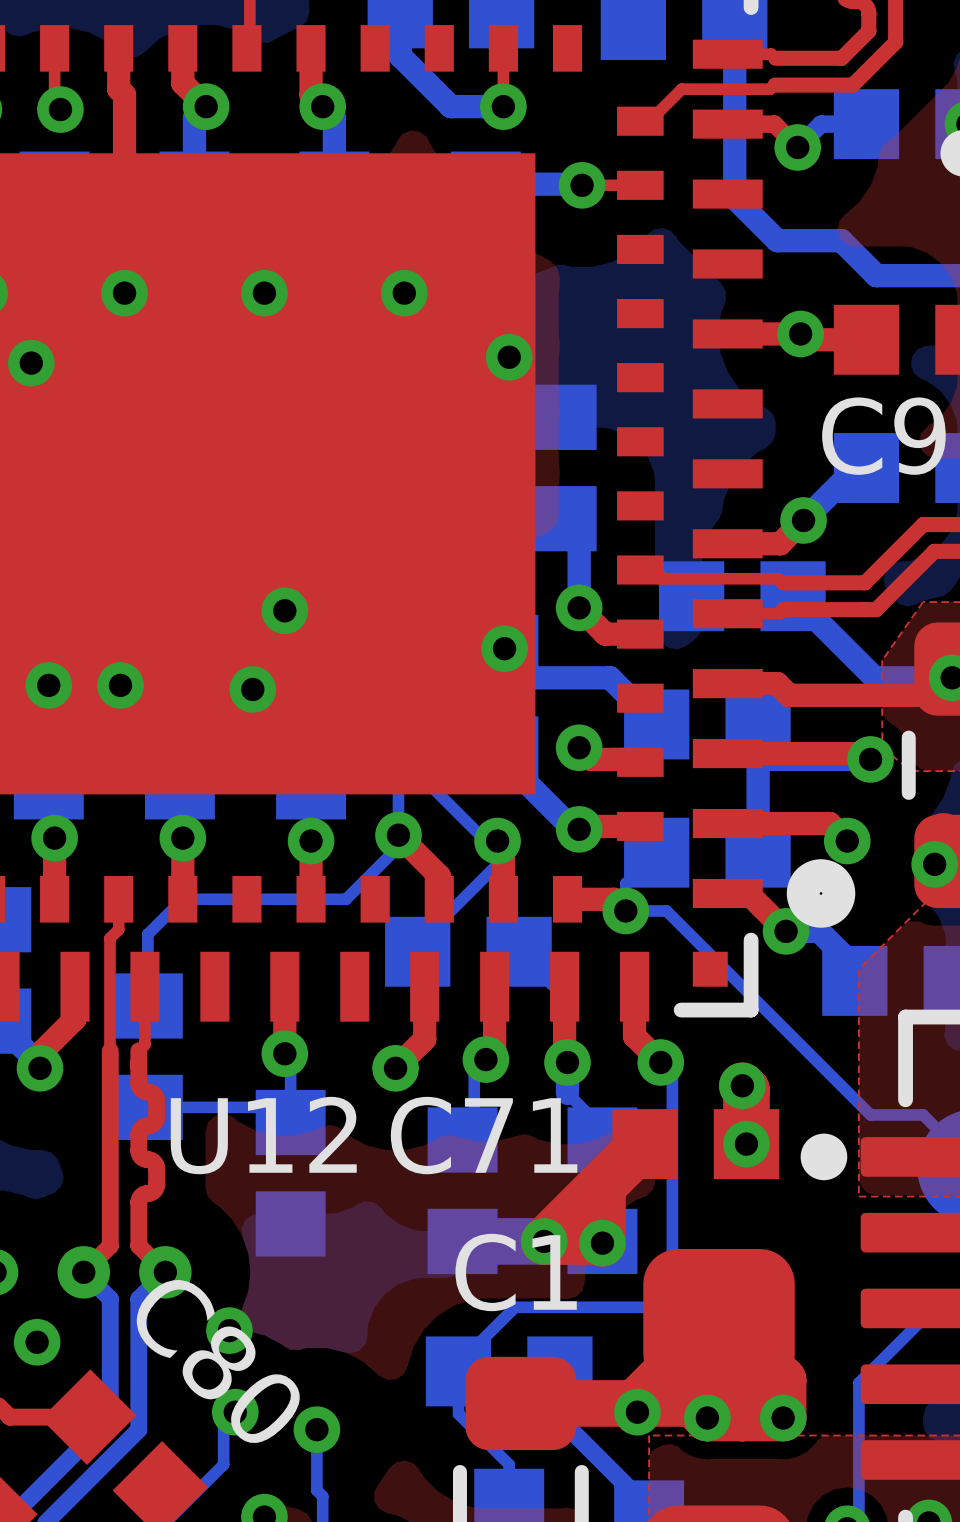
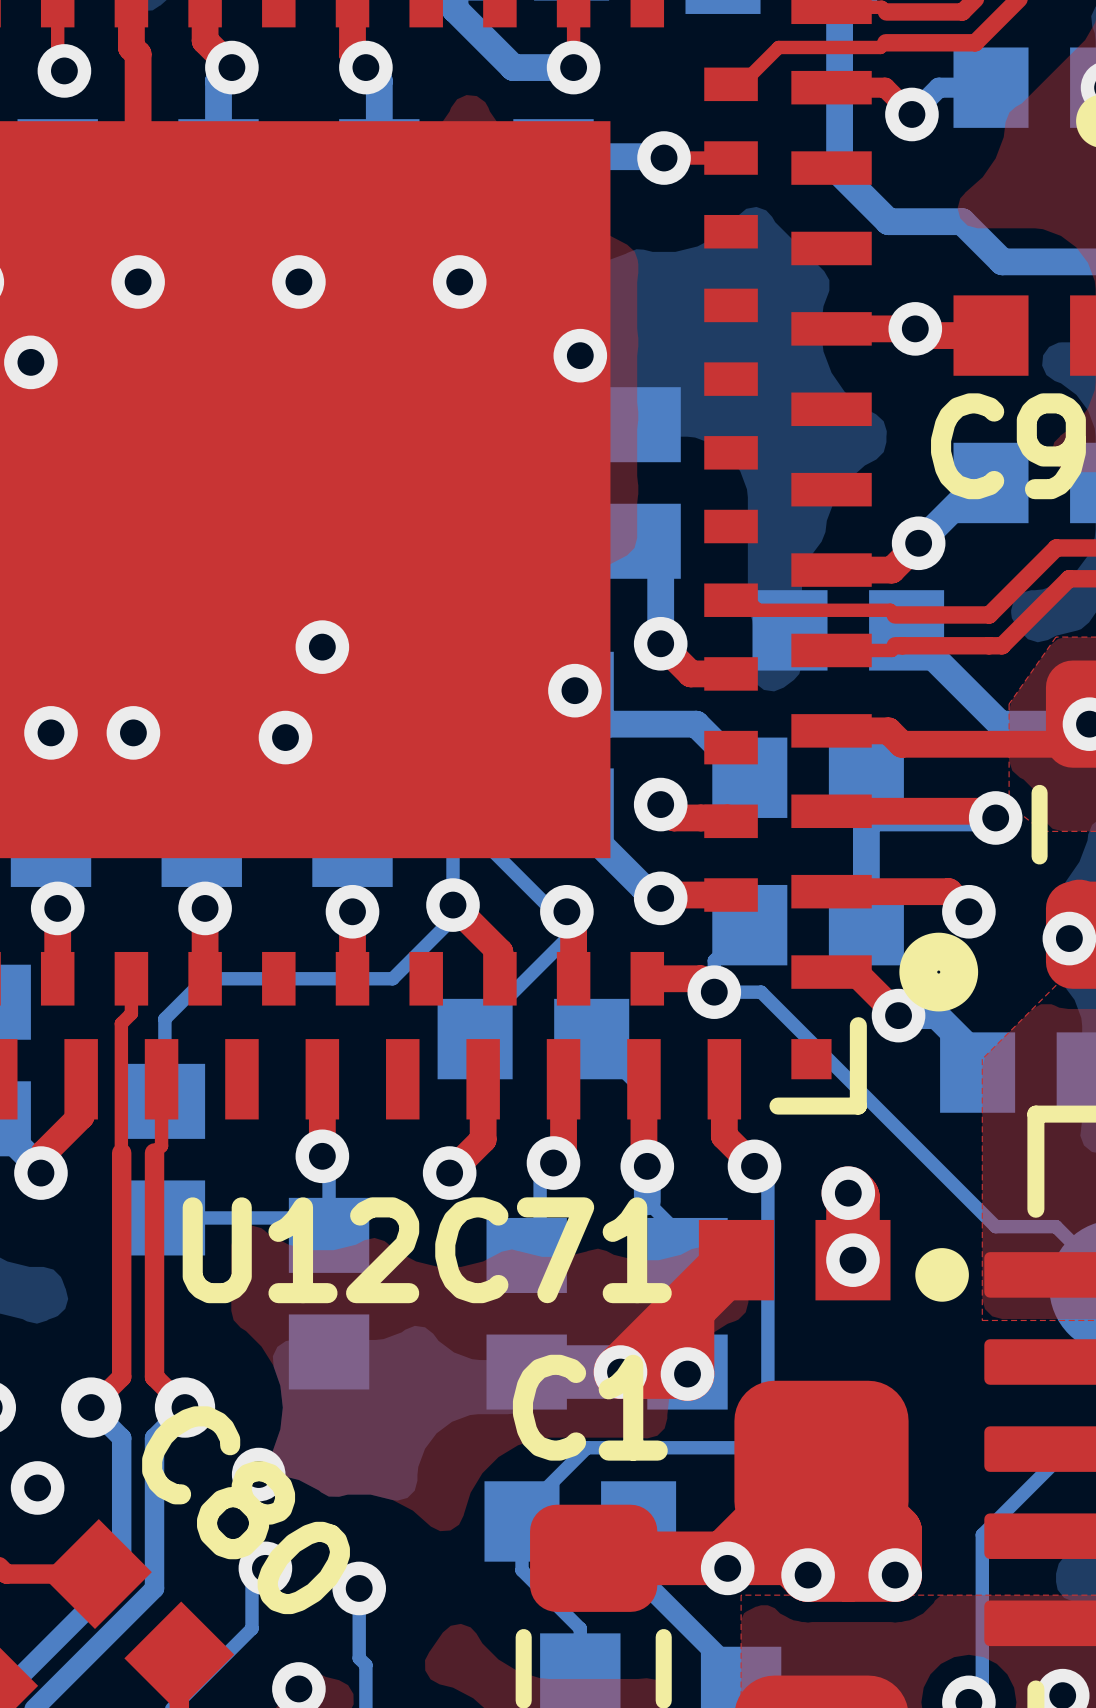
top track: (138, 1083) (141, 1089) (153, 1093) (156, 1100) (155, 1121) (151, 1125) (142, 1127) (138, 1134) -> (154, 1190) (154, 1249)
top track: (138, 1150) (141, 1157) (153, 1161) (156, 1168) (155, 1189) (151, 1192) (142, 1195) (138, 1202) -> (154, 1267) (154, 1327)

